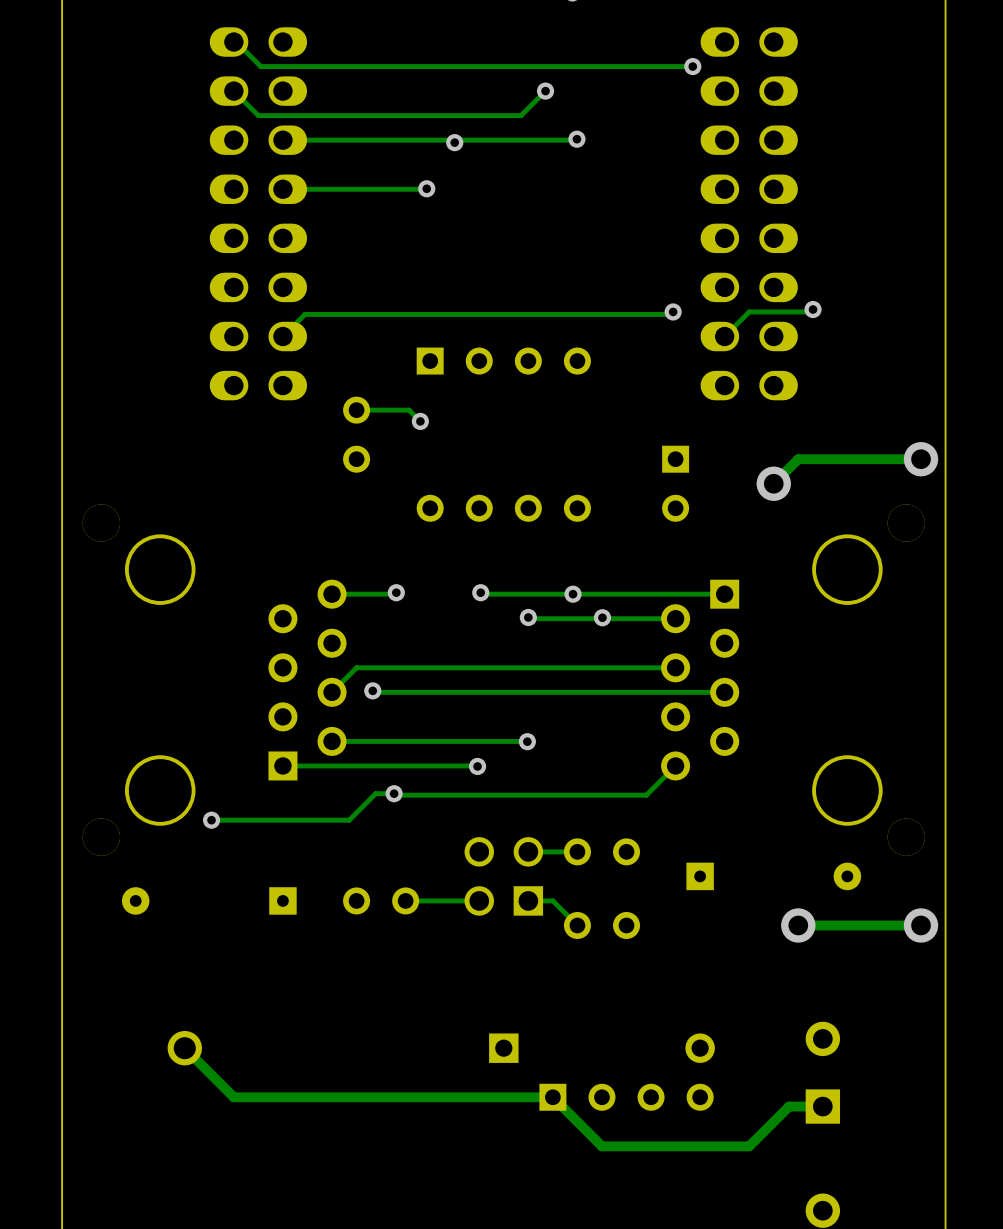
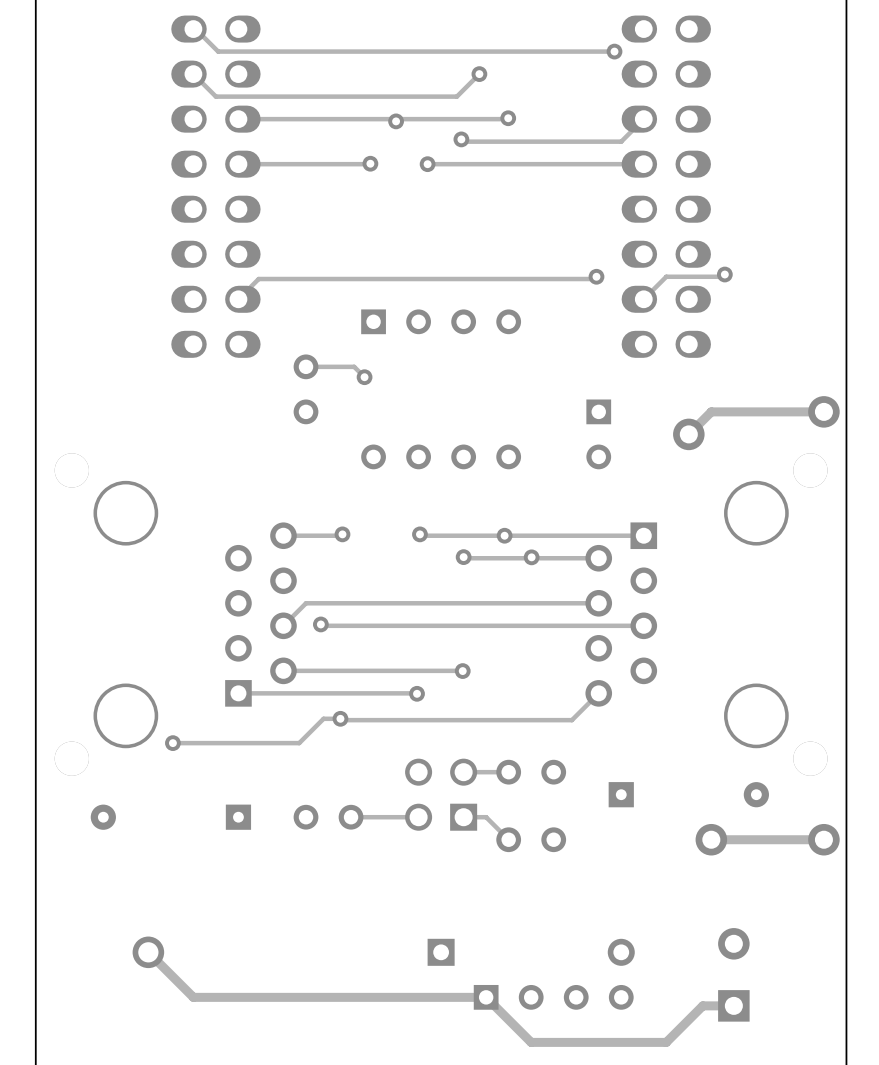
track: none -> (643, 119) (621, 141) (463, 141) (461, 139)
via: none -> (461, 139)
via: none -> (427, 164)
track: none -> (643, 164) (427, 164)

